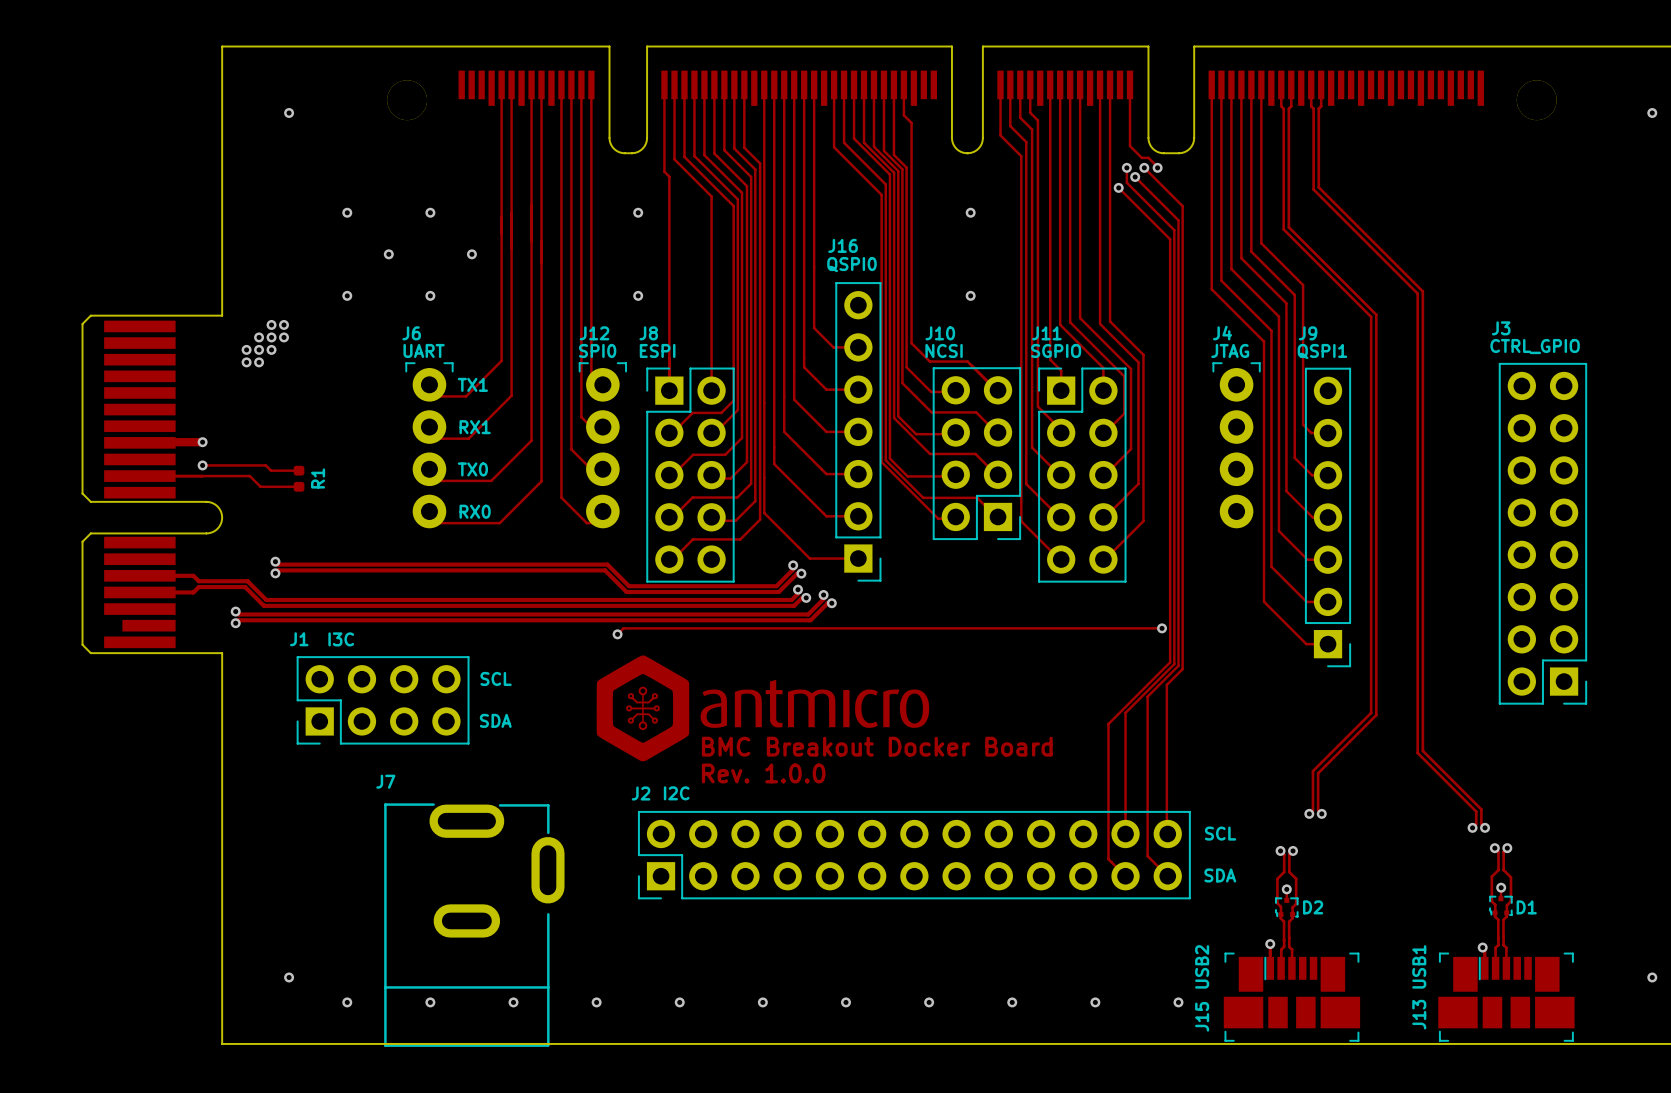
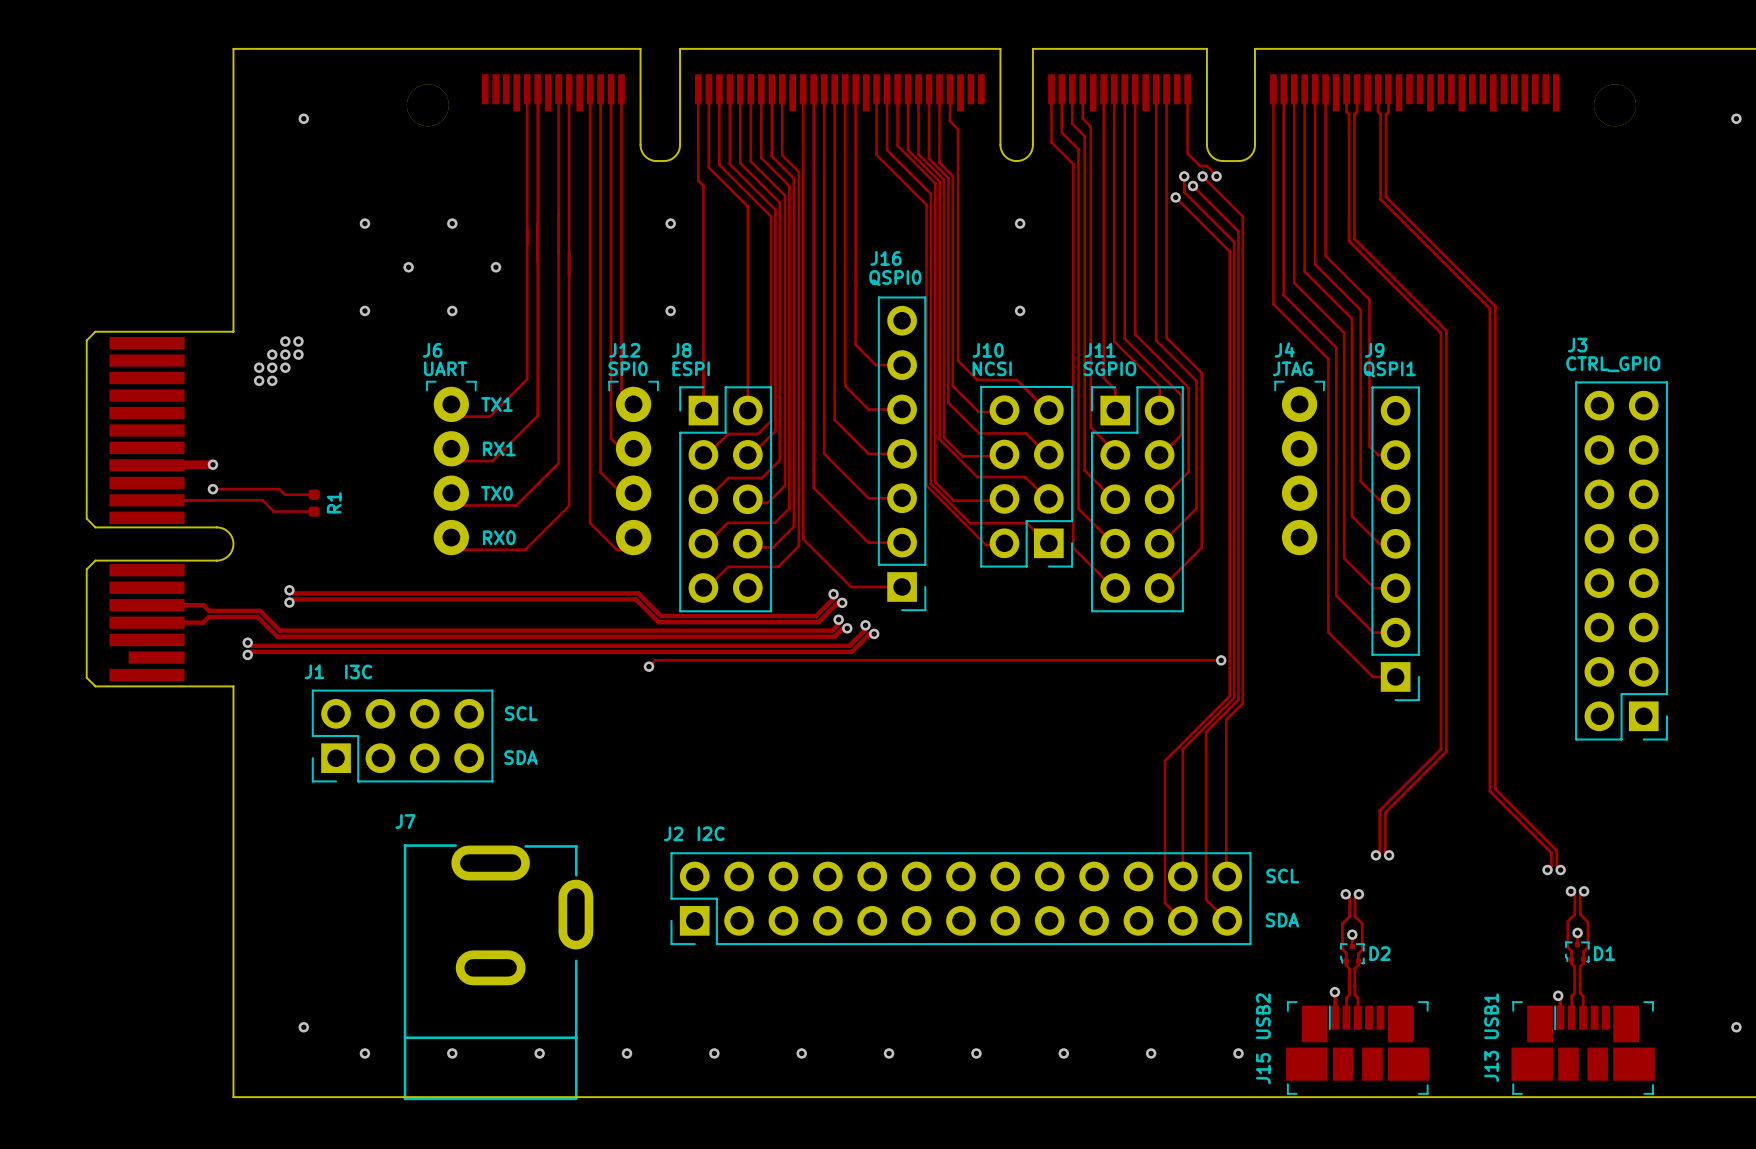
drawing: [596, 655, 930, 762] -> none
text: BMC Breakout Docker Board (877, 746) -> none
text: Rev. 1.0.0 (763, 773) -> none

